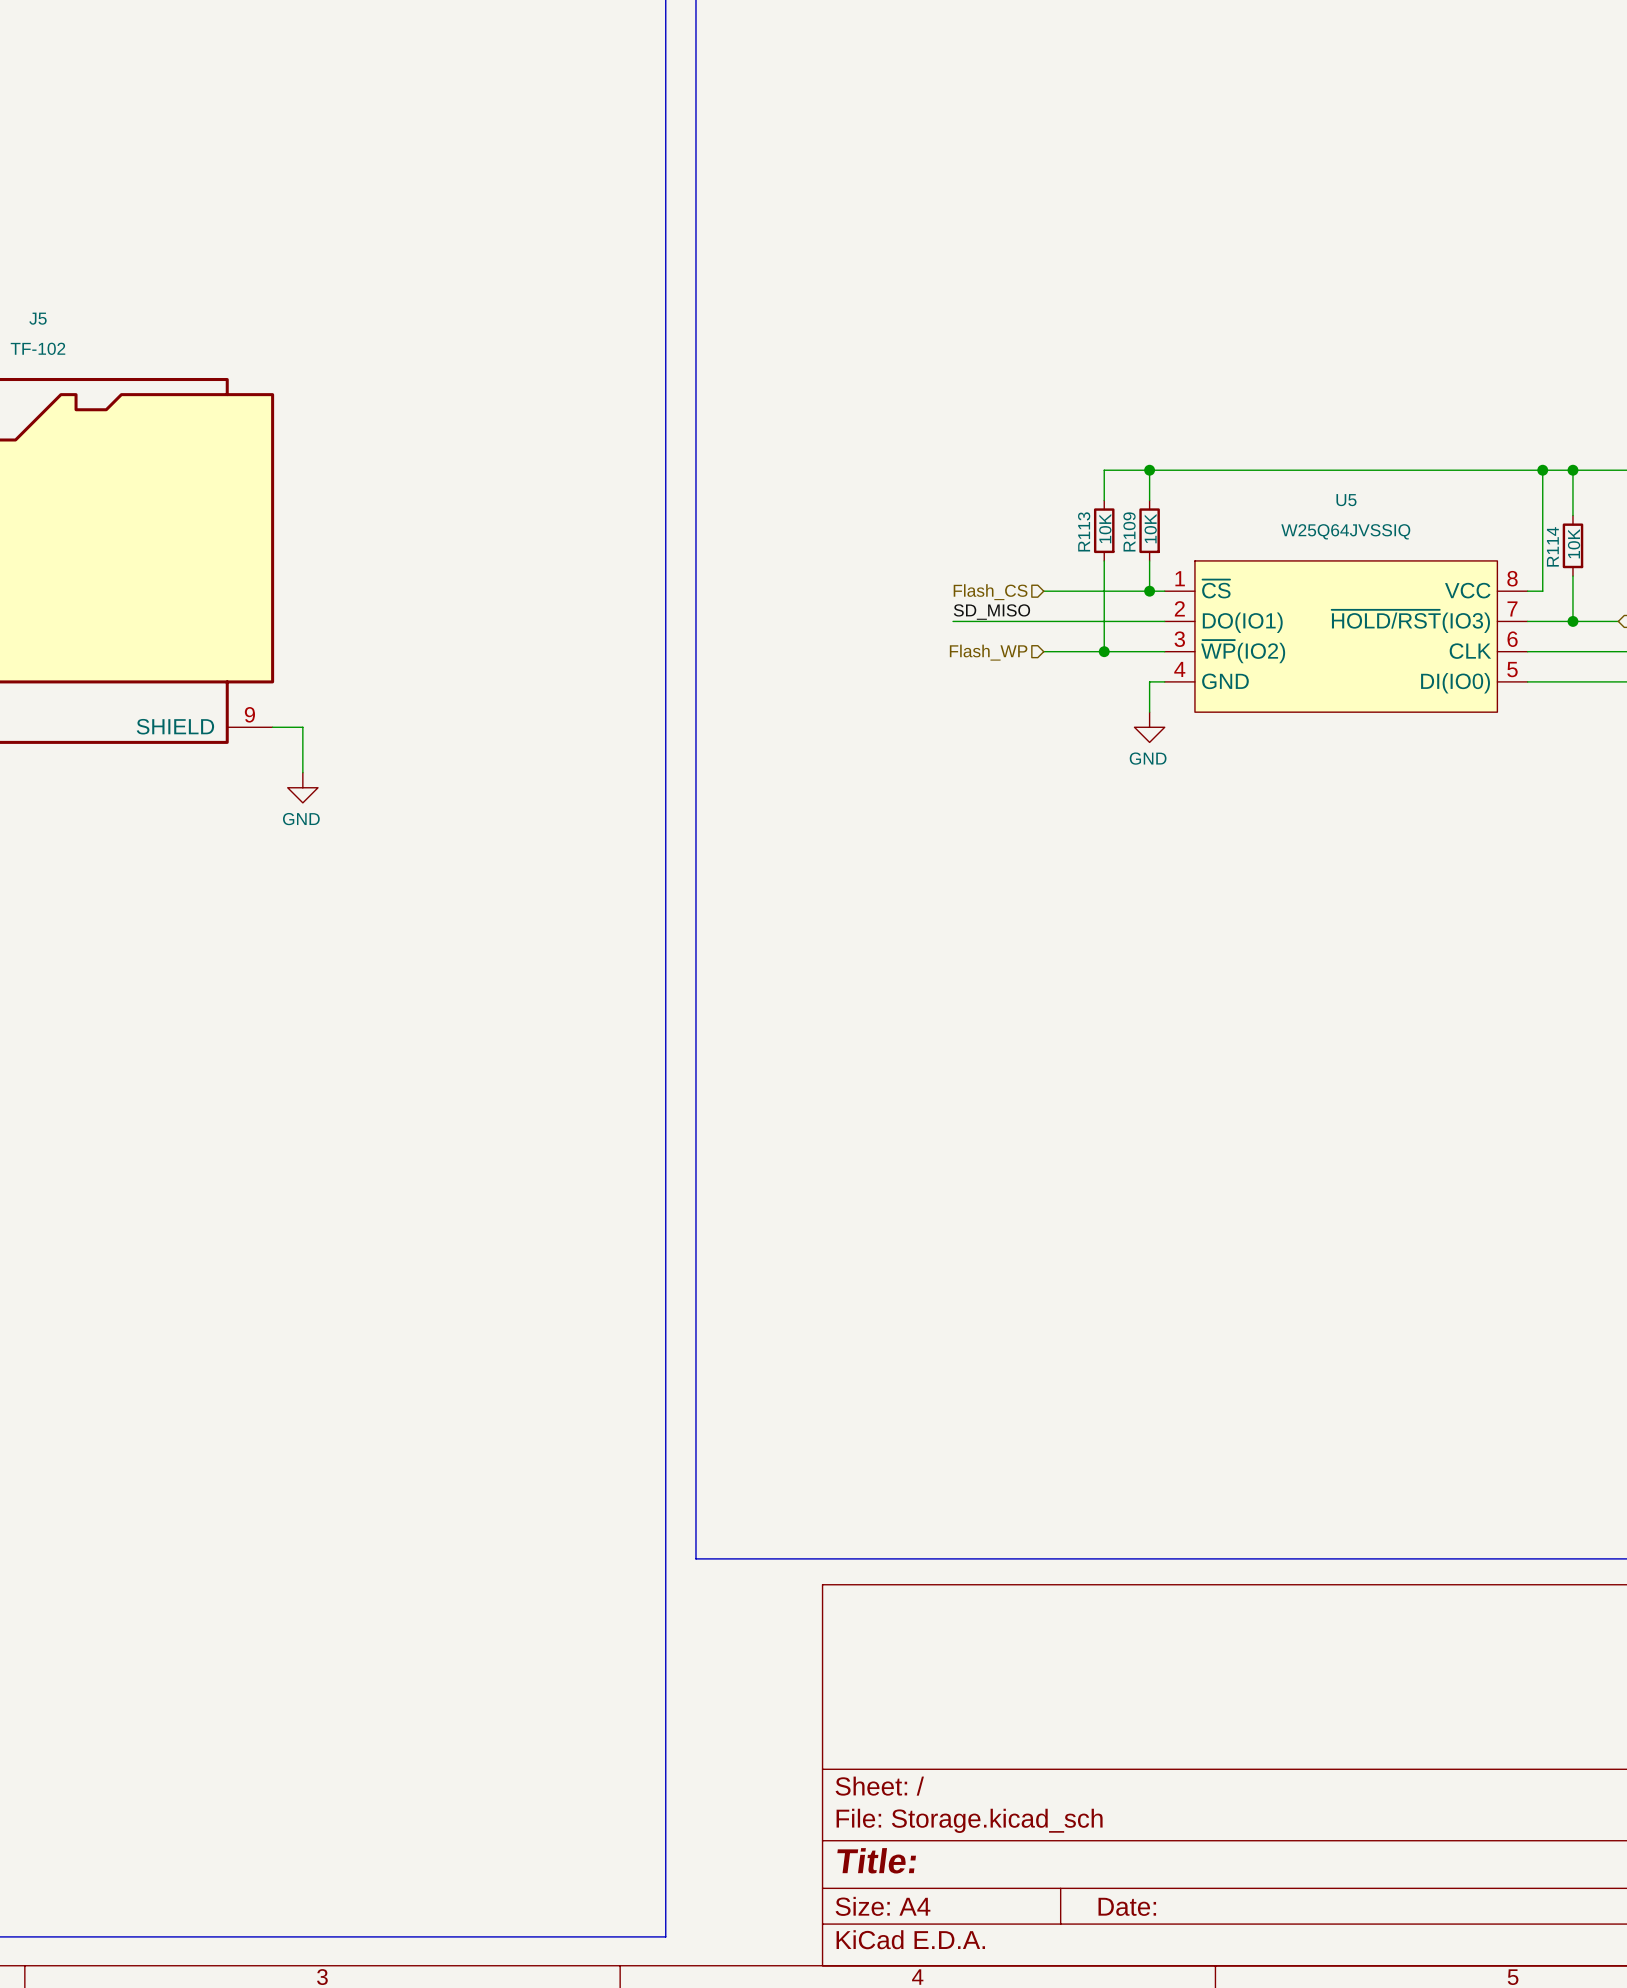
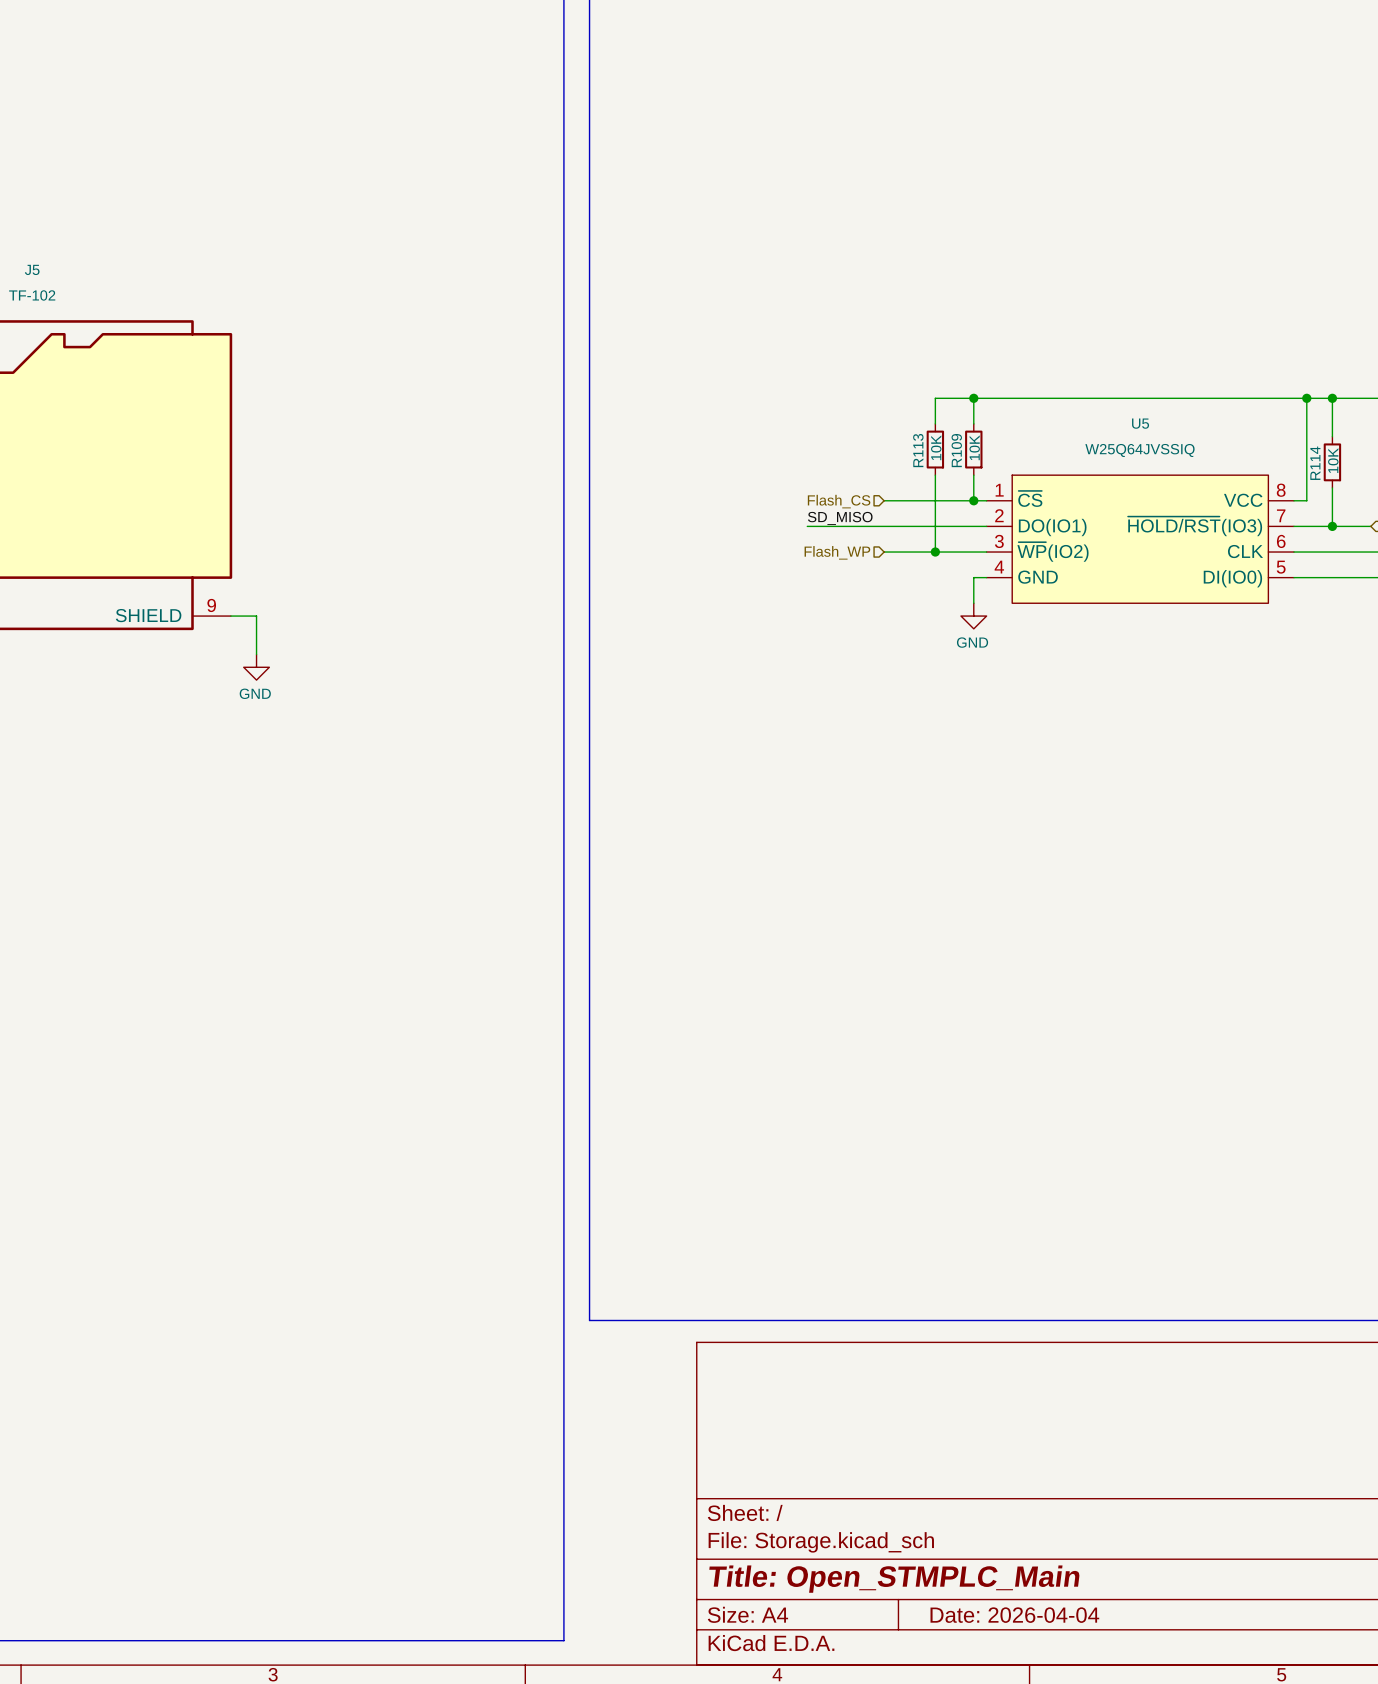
title block: Title: (876, 1860) -> Title: Open_STMPLC_Main (894, 1579)
title block: Date: (1127, 1906) -> Date: 2026-04-04 (1014, 1615)

